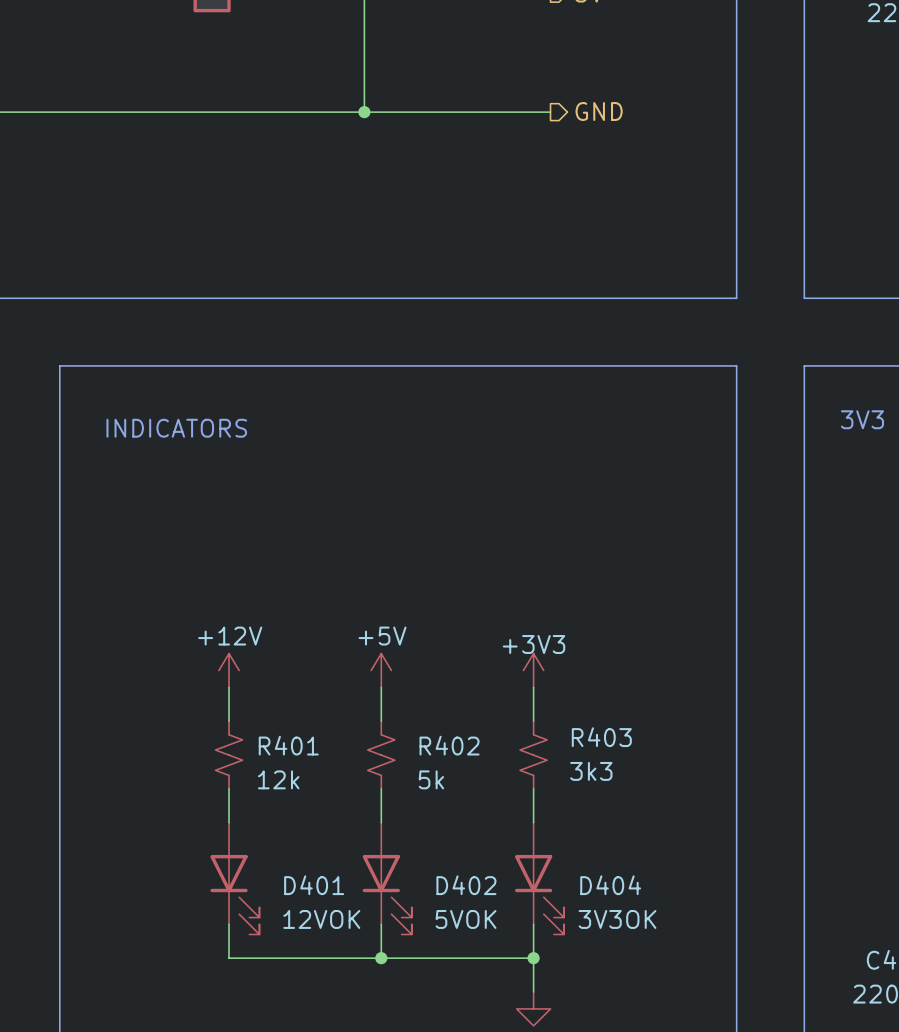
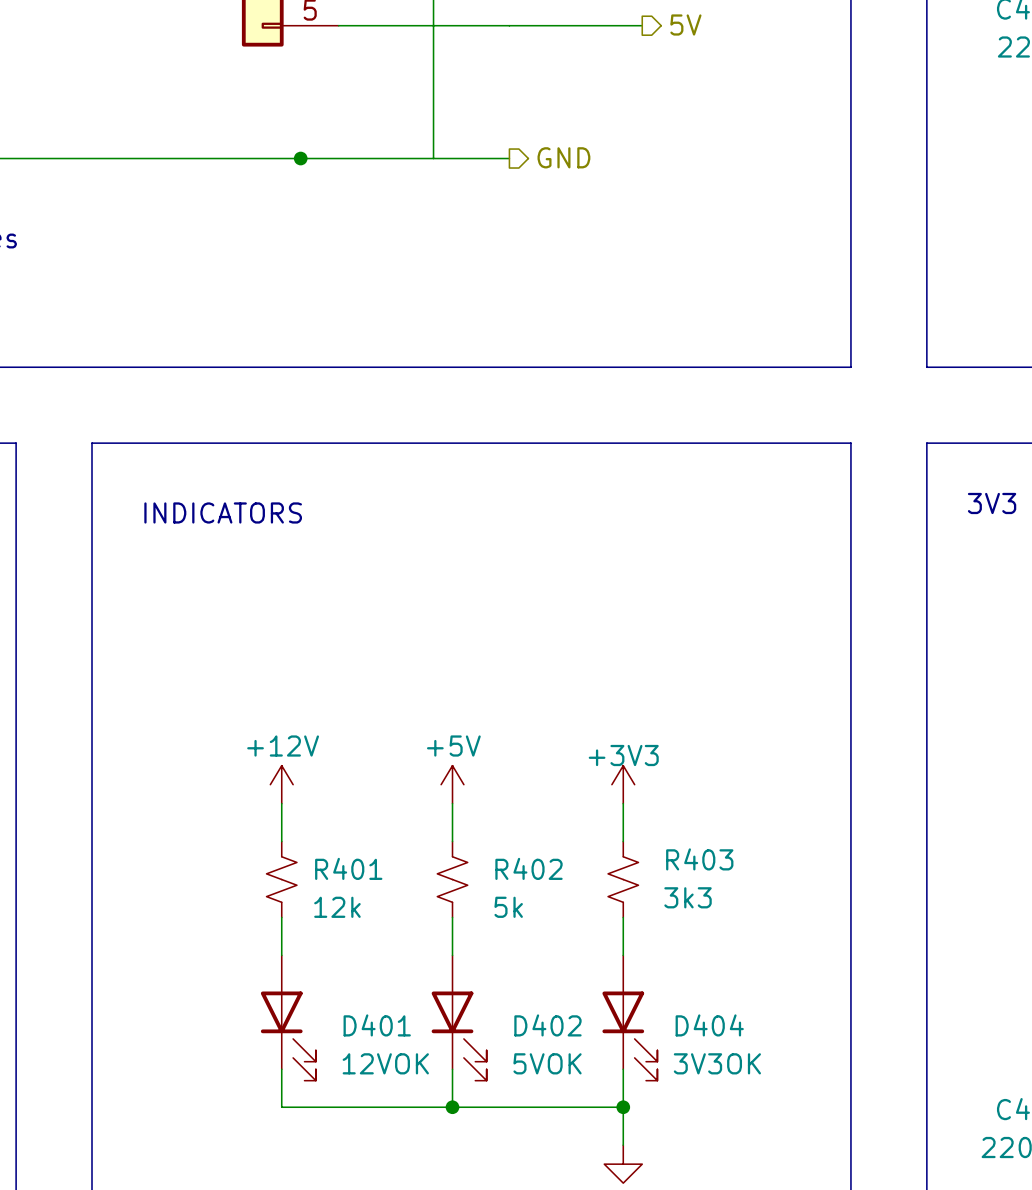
hierarchical label position: GND (599, 111) -> GND (563, 157)
junction: none -> (300, 158)
junction: (364, 112) -> none
wire: (432, 112) (550, 112) -> none

